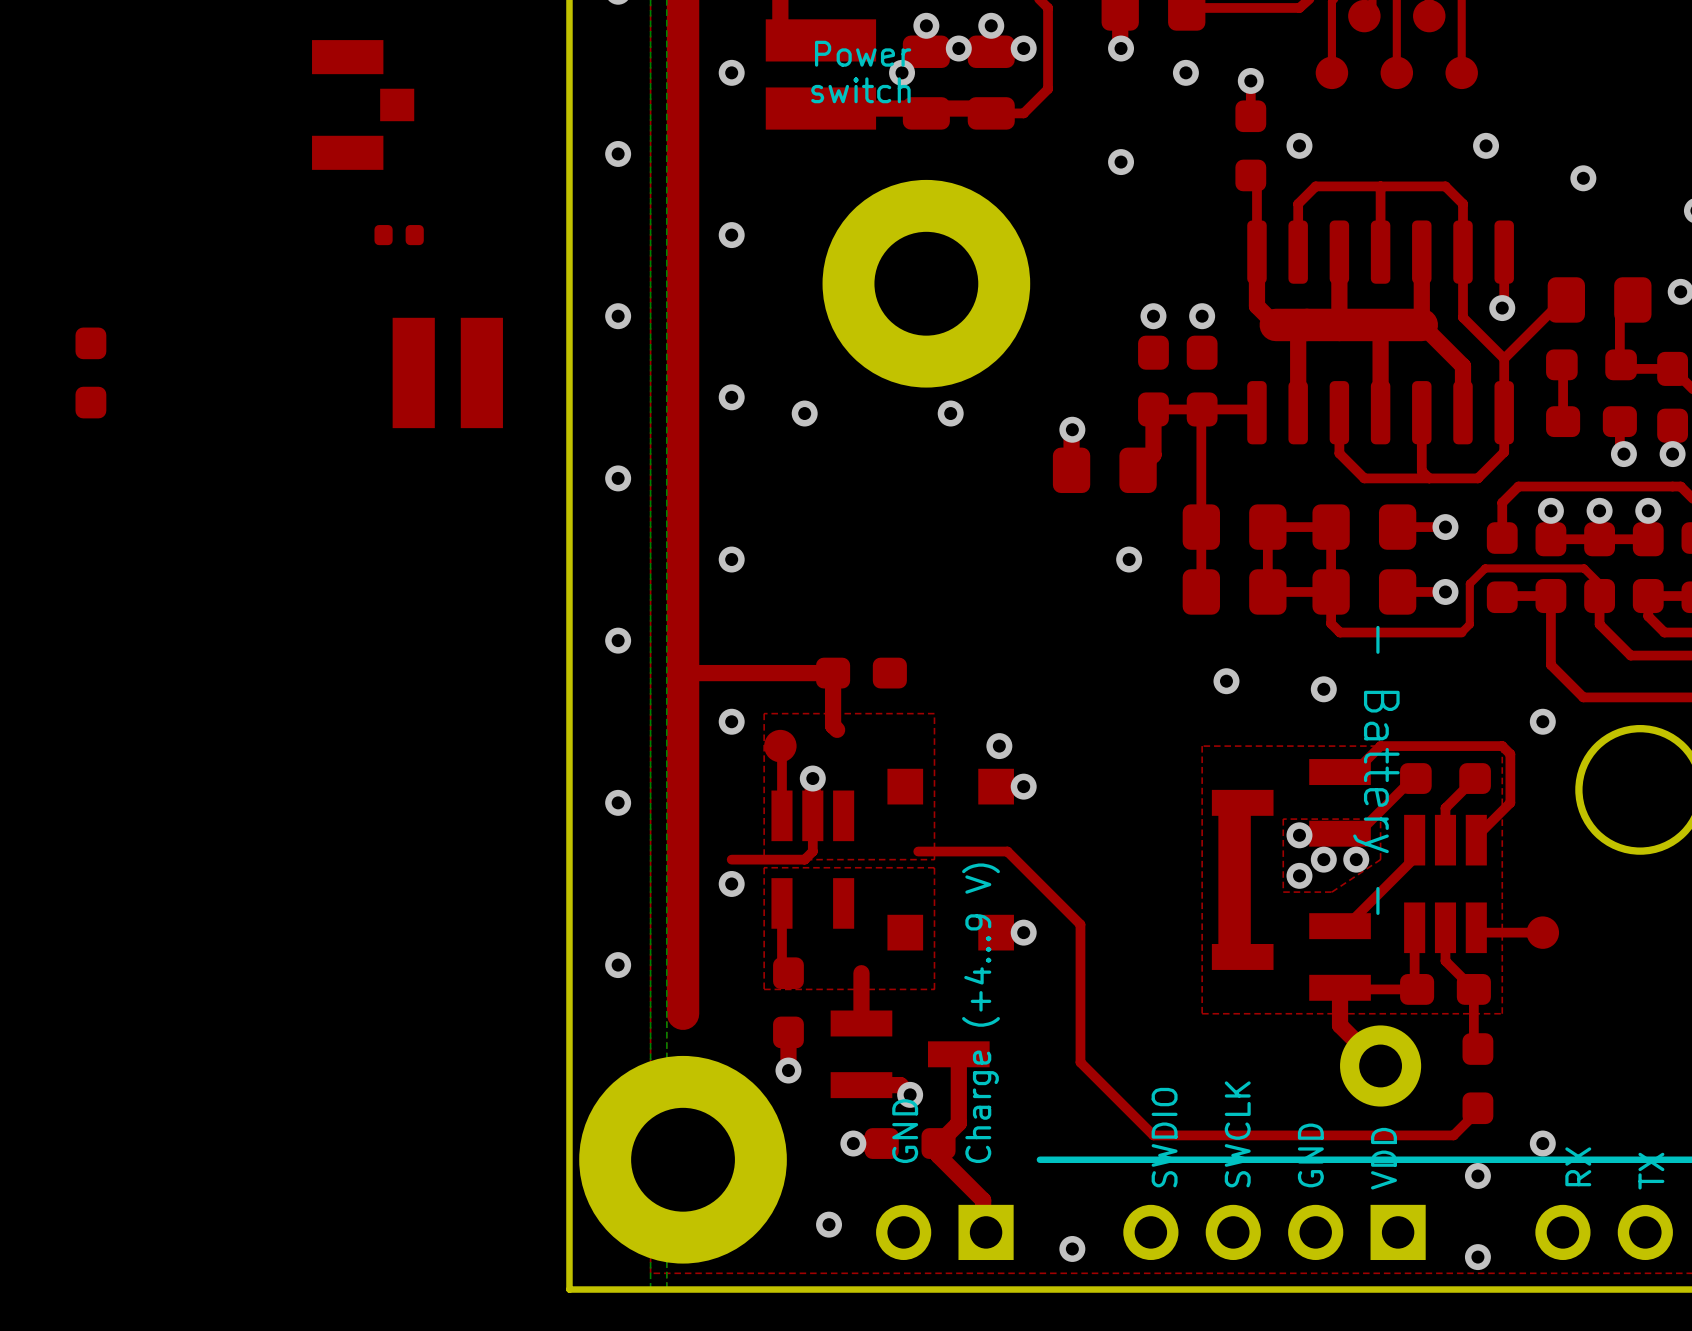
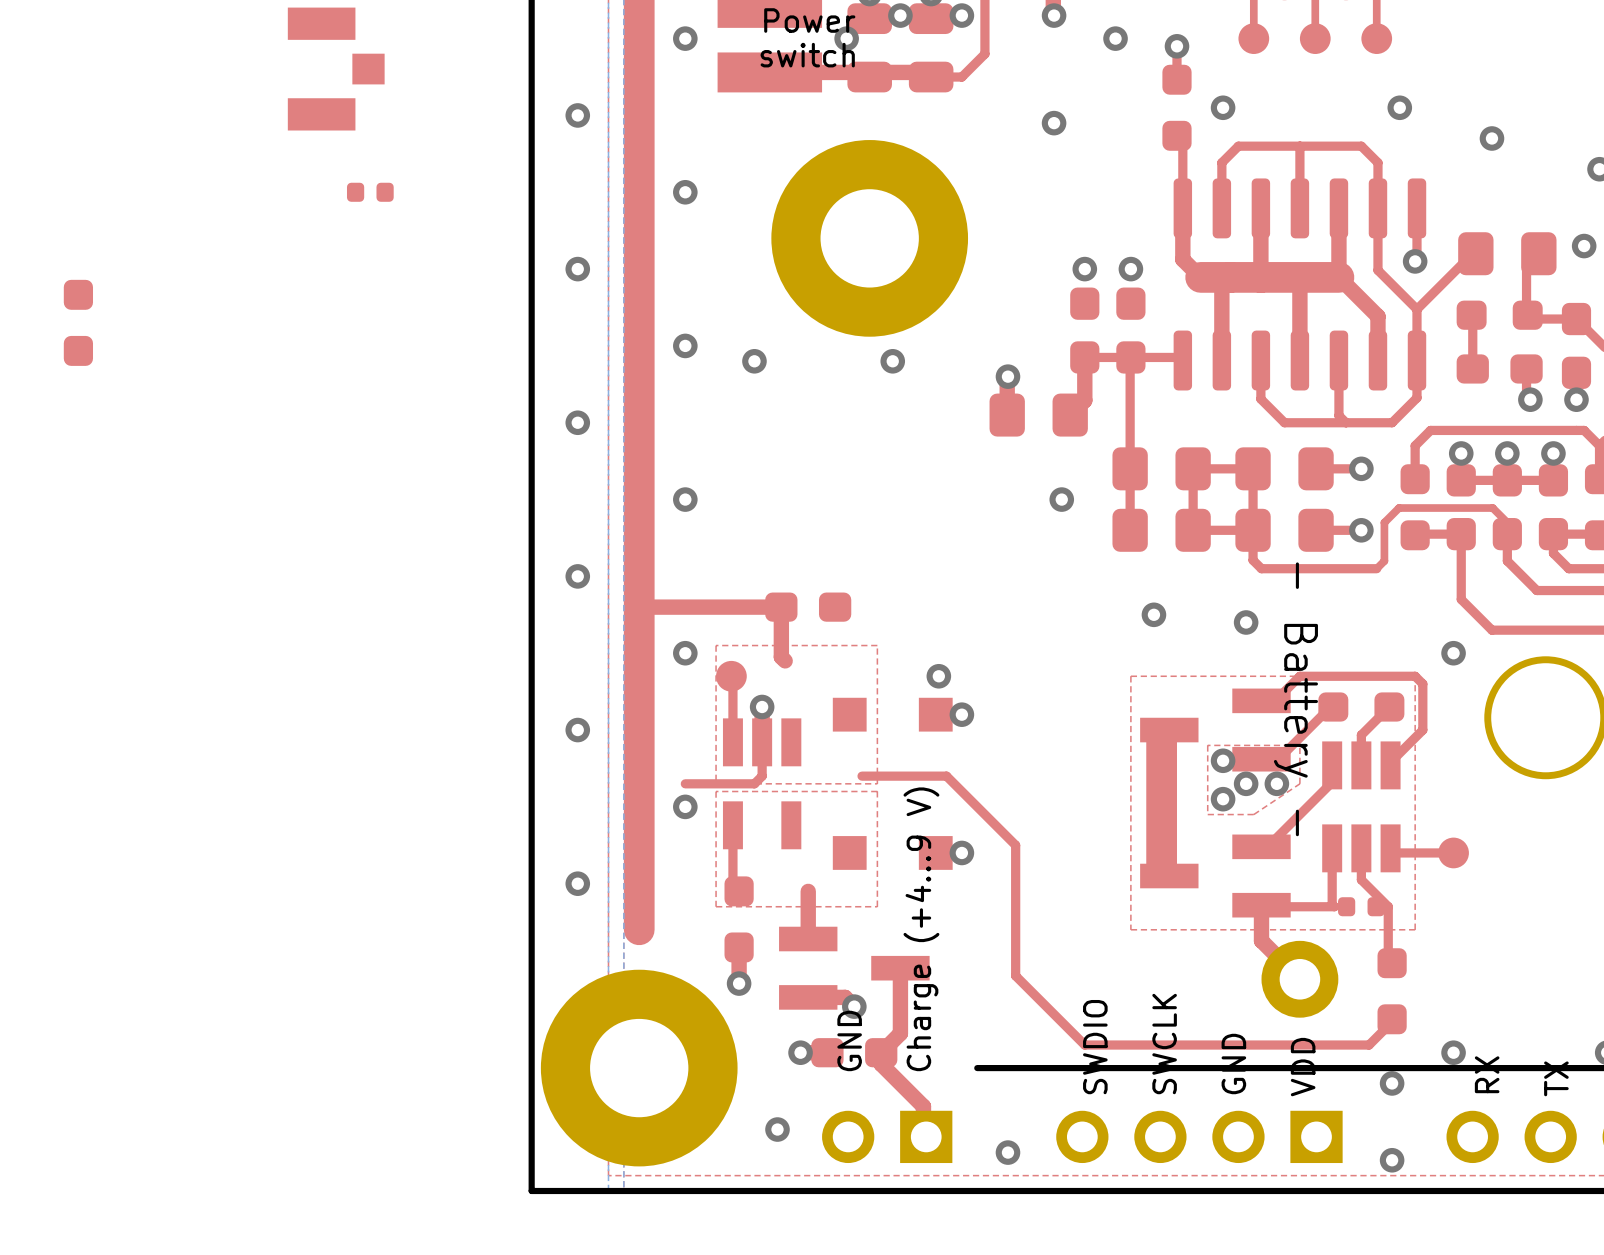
part: (447, 372) -> none
part footprint: [1400, 974, 1491, 1005] -> [1338, 897, 1385, 917]

